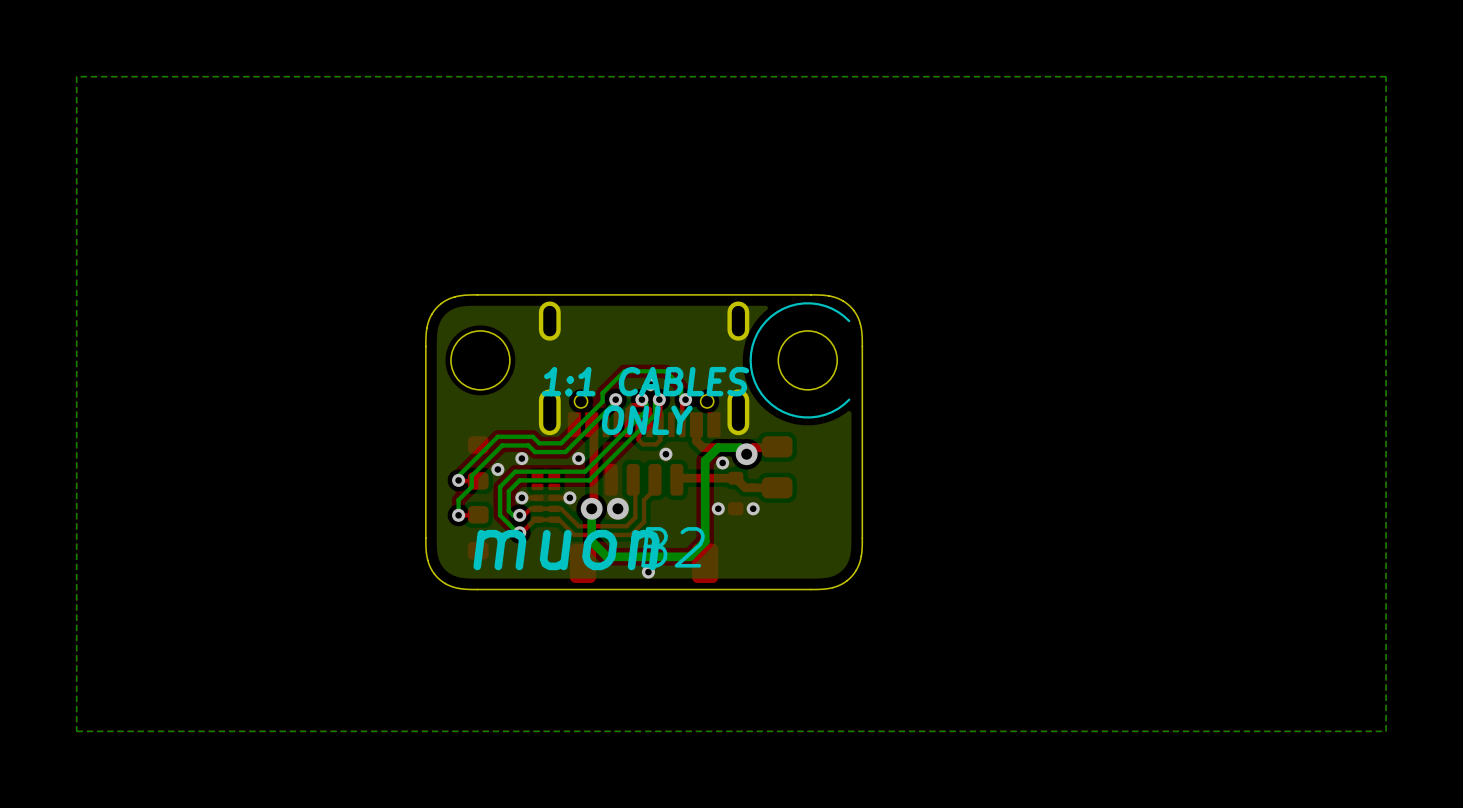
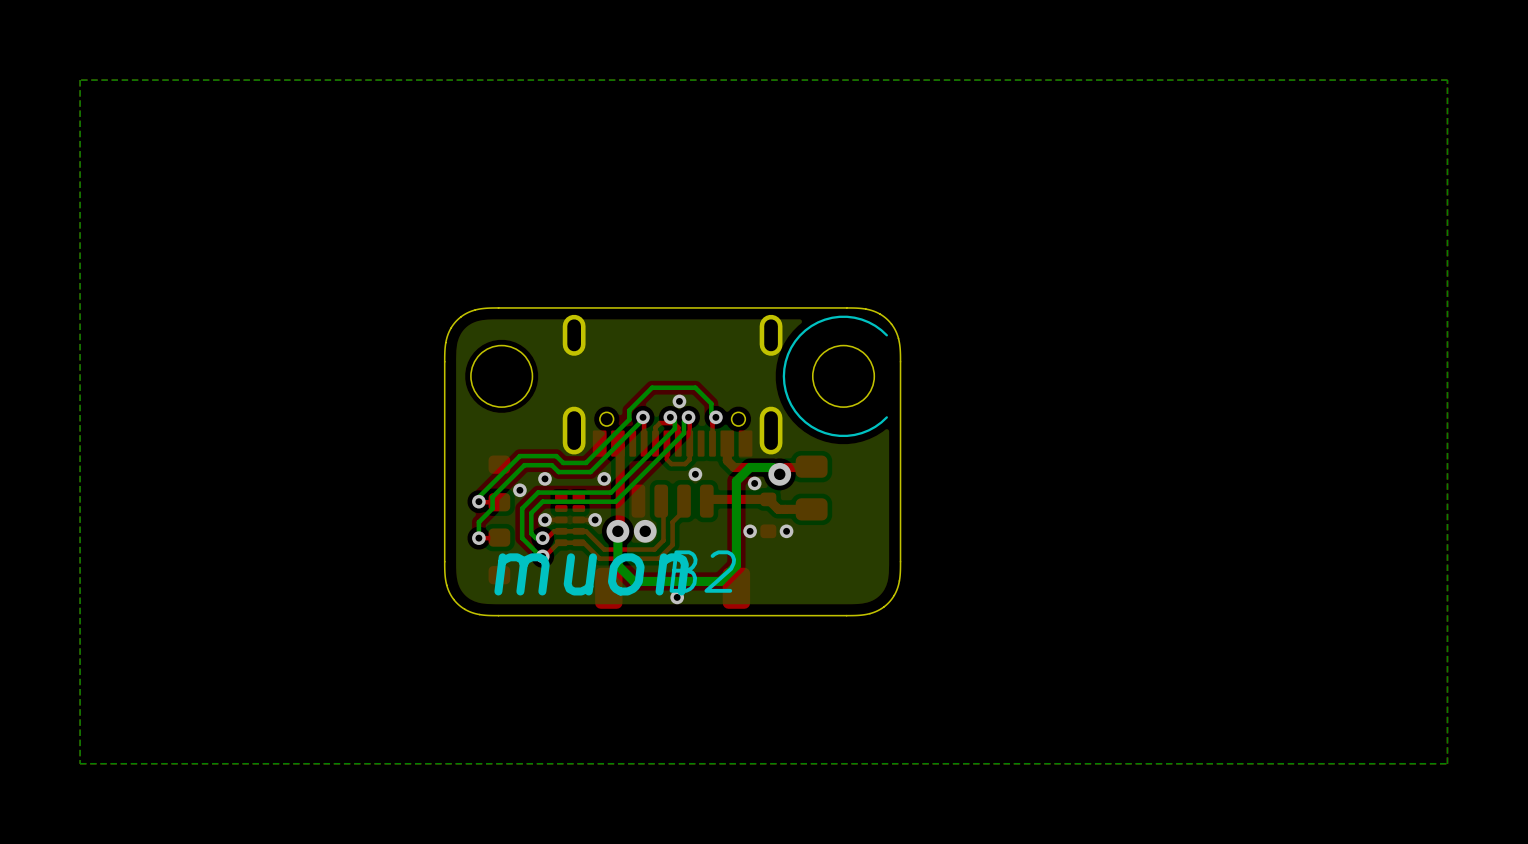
text: 1:1 CABLES (645, 381) -> none
text: ONLY (647, 420) -> none

